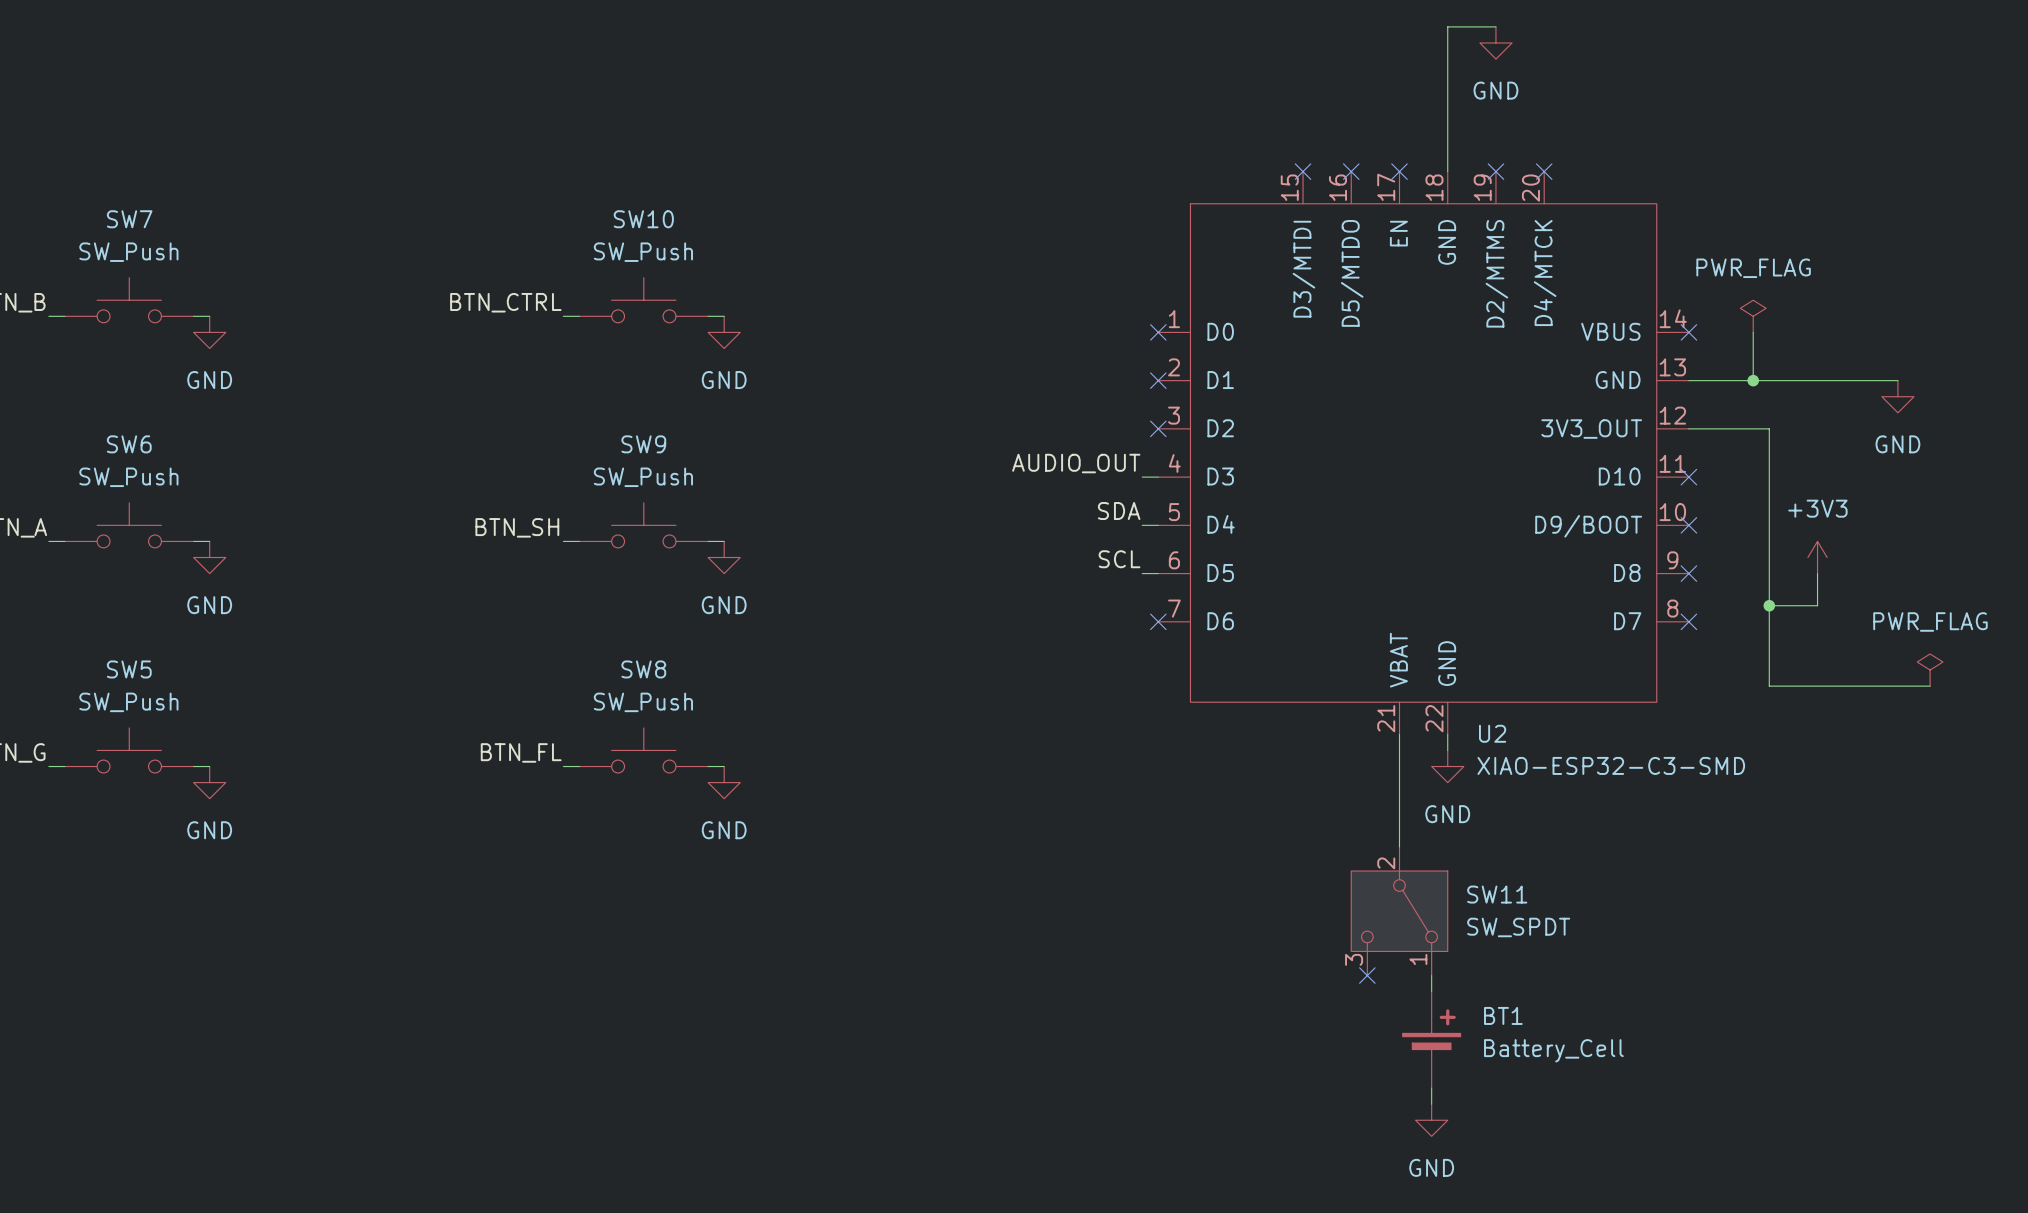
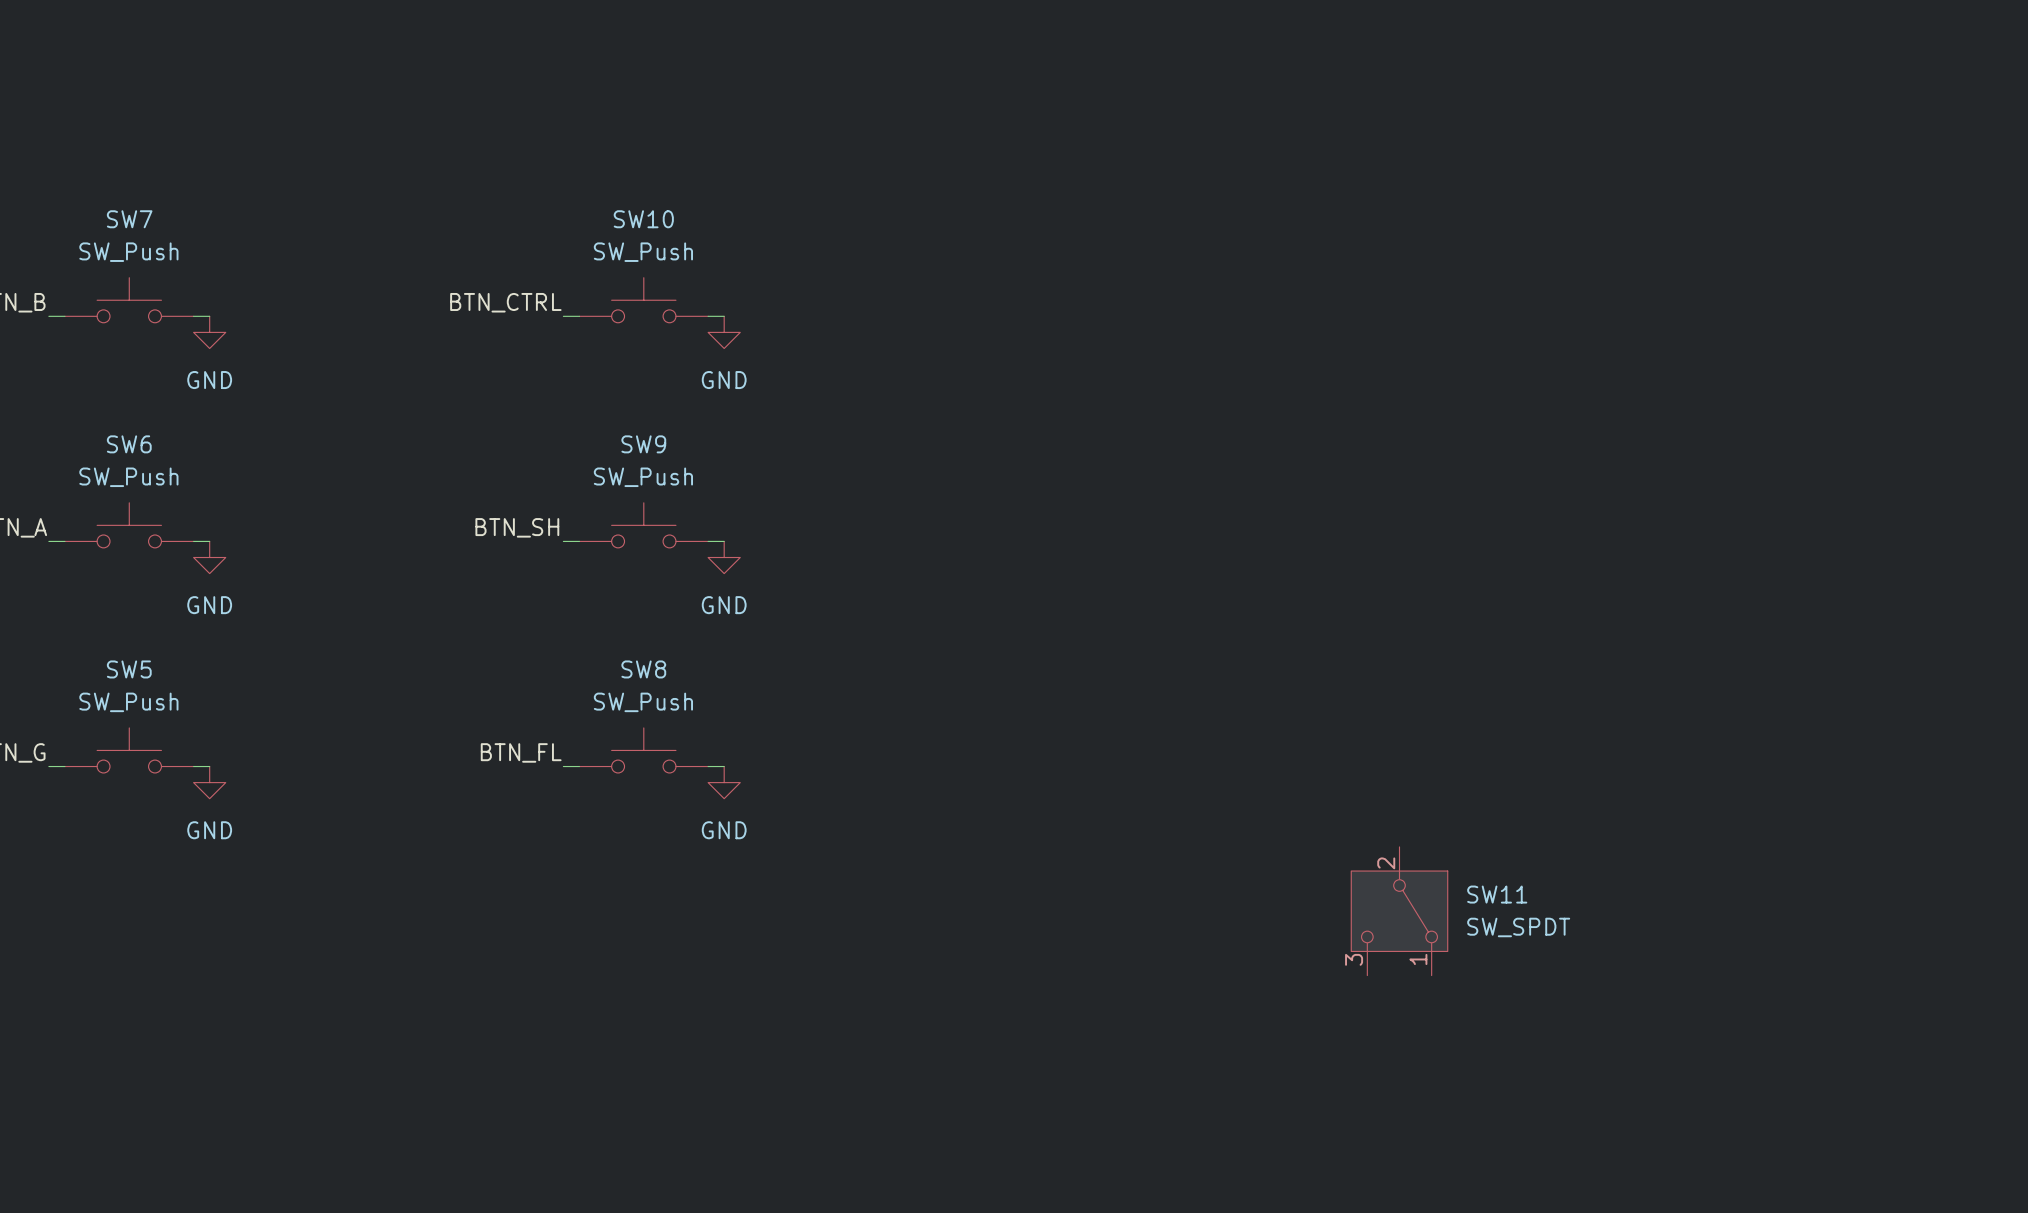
wire: (1495, 26) (1447, 26) (1447, 171) -> none
power symbol: GND (1495, 42) -> none
no-connect mark: (1303, 171) -> none
no-connect mark: (1351, 171) -> none
no-connect mark: (1399, 171) -> none
no-connect mark: (1495, 171) -> none
no-connect mark: (1544, 171) -> none
power symbol: PWR_FLAG (1753, 316) -> none
no-connect mark: (1158, 332) -> none
no-connect mark: (1688, 332) -> none
wire: (1753, 332) (1753, 380) -> none
no-connect mark: (1158, 380) -> none
wire: (1688, 380) (1897, 380) -> none
junction: (1753, 380) -> none
power symbol: GND (1897, 396) -> none
no-connect mark: (1158, 428) -> none
wire: (1688, 428) (1769, 428) (1769, 686) (1930, 686) -> none
U2: XIAO-ESP32-C3-SMD (1423, 452) -> none
label: AUDIO_OUT (1076, 463) -> none
wire: (1142, 477) (1158, 477) -> none
no-connect mark: (1688, 477) -> none
label: SDA (1119, 511) -> none
wire: (1142, 525) (1158, 525) -> none
no-connect mark: (1688, 525) -> none
power symbol: +3V3 (1817, 557) -> none
label: SCL (1119, 559) -> none
wire: (1142, 573) (1158, 573) -> none
no-connect mark: (1688, 573) -> none
wire: (1817, 573) (1817, 605) (1769, 605) -> none
junction: (1769, 605) -> none
no-connect mark: (1158, 621) -> none
no-connect mark: (1688, 621) -> none
power symbol: PWR_FLAG (1930, 670) -> none
wire: (1399, 734) (1399, 846) -> none
wire: (1447, 734) (1447, 750) -> none
power symbol: GND (1447, 766) -> none
no-connect mark: (1367, 975) -> none
wire: (1431, 975) (1431, 991) -> none
BT1: Battery_Cell (1431, 1039) -> none
wire: (1431, 1088) (1431, 1104) -> none
power symbol: GND (1431, 1120) -> none

